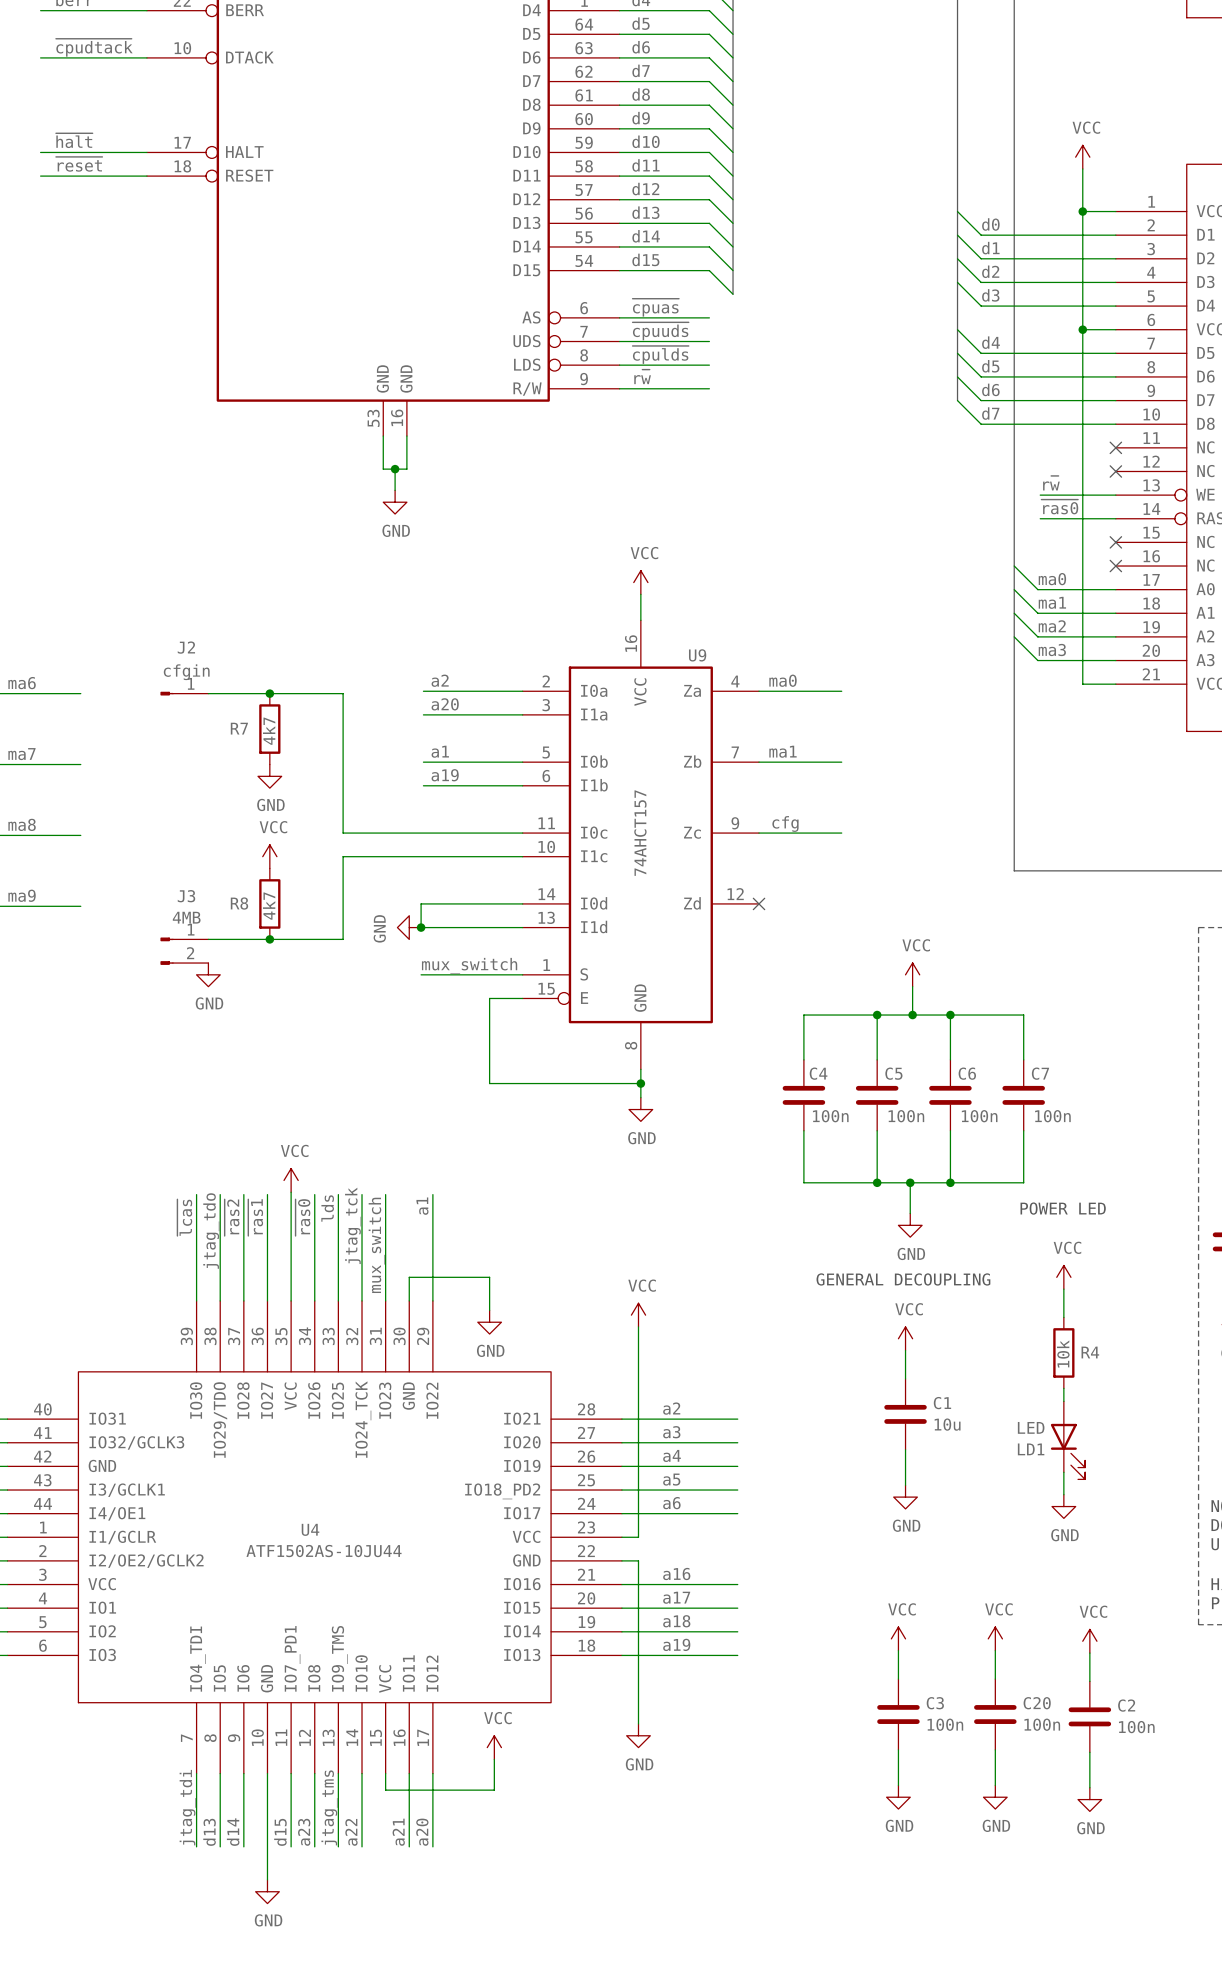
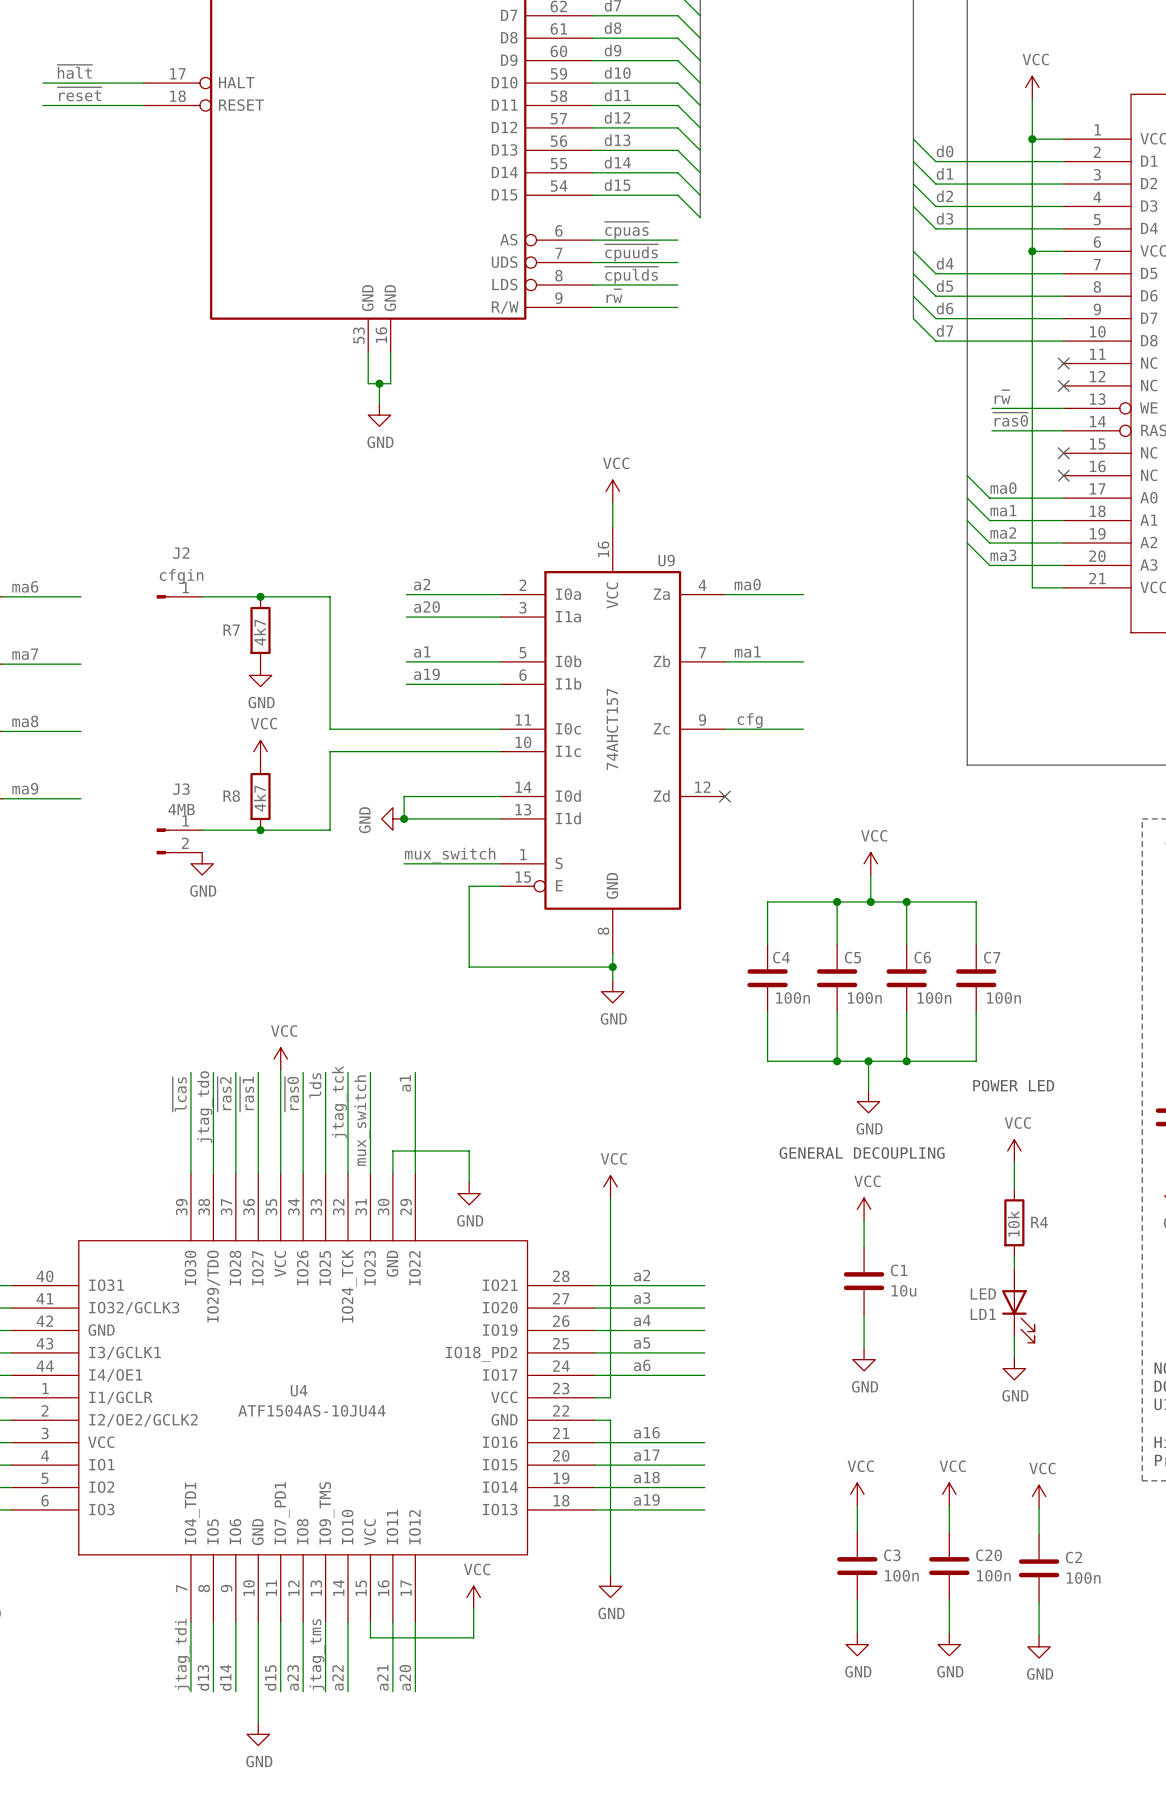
U4 value: ATF1502AS-10JU44 (324, 1551) -> ATF1504AS-10JU44 (311, 1410)

